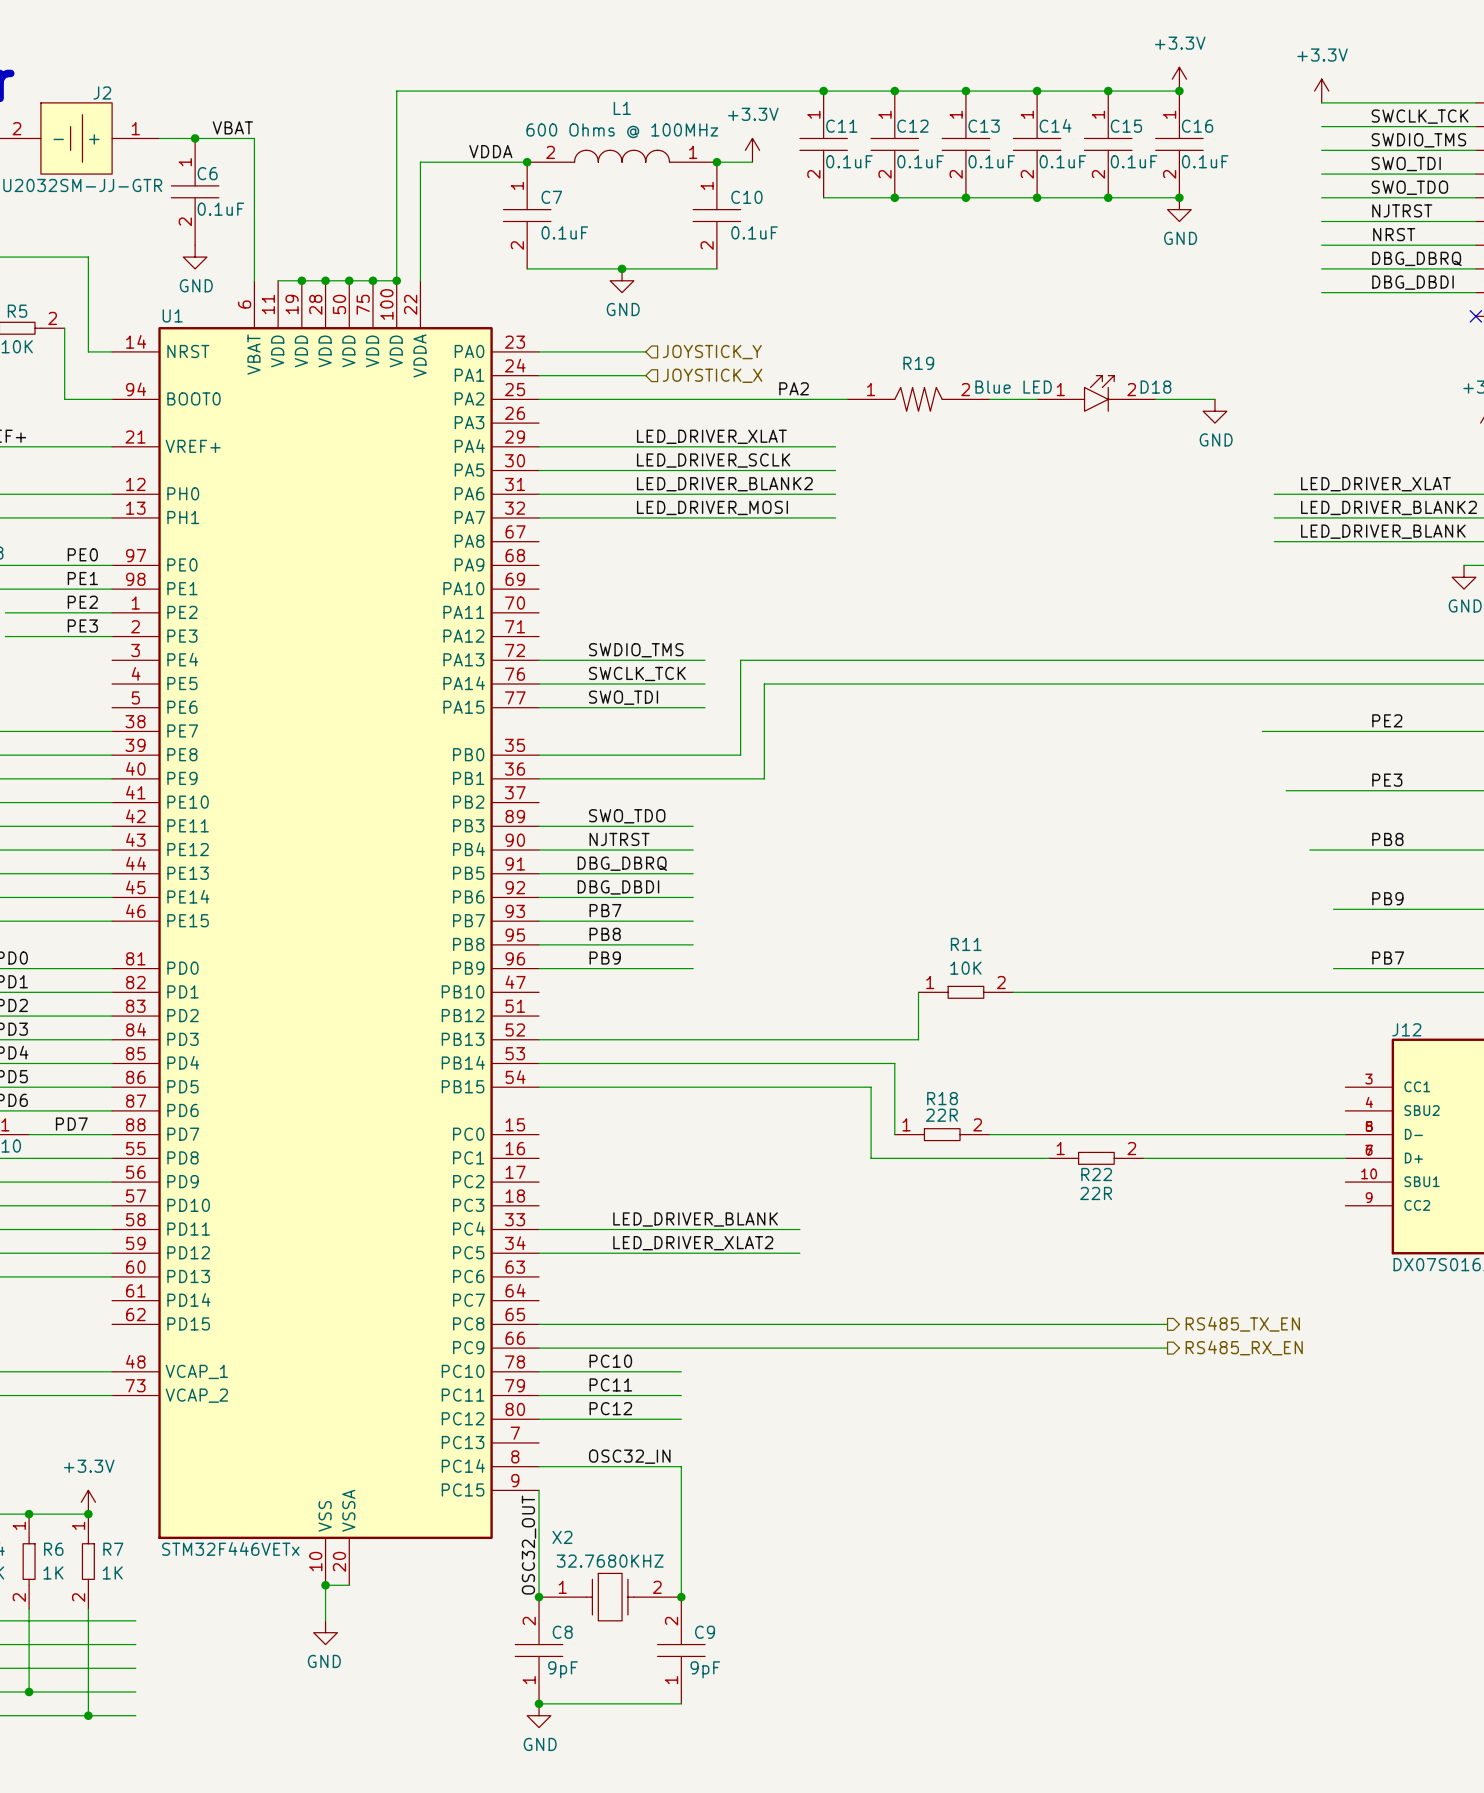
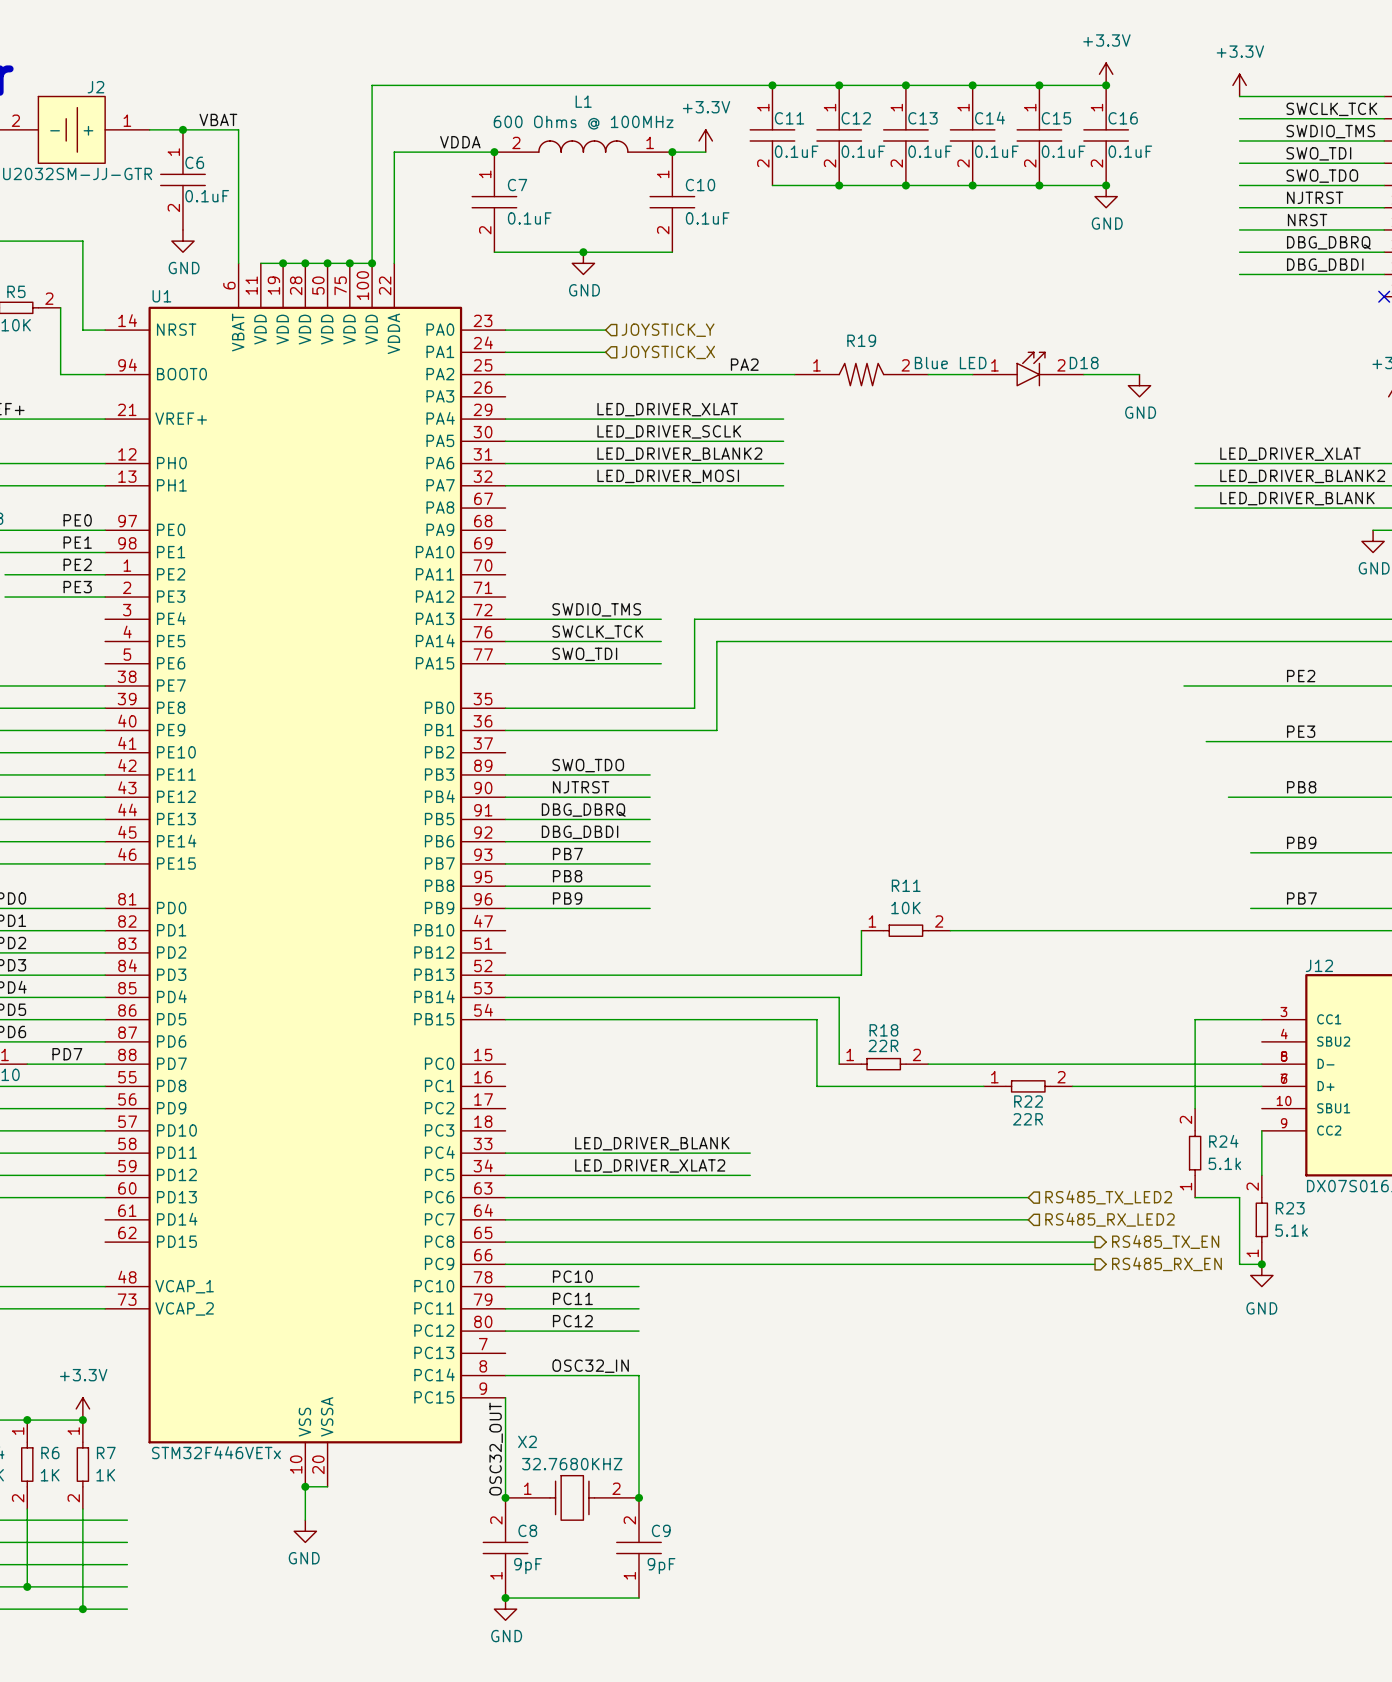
wire: none -> (1261, 1019) (1195, 1019) (1195, 1108)
wire: none -> (1261, 1130) (1261, 1175)
R24: none -> (1195, 1153)
wire: none -> (505, 1197) (1028, 1197)
hierarchical label: none -> RS485_TX_LED2 (1108, 1197)
wire: none -> (1195, 1197) (1239, 1197) (1239, 1264) (1261, 1264)
wire: none -> (505, 1219) (1028, 1219)
hierarchical label: none -> RS485_RX_LED2 (1110, 1219)
R23: none -> (1261, 1219)
junction: none -> (1261, 1264)
power symbol: none -> GND (1261, 1275)

